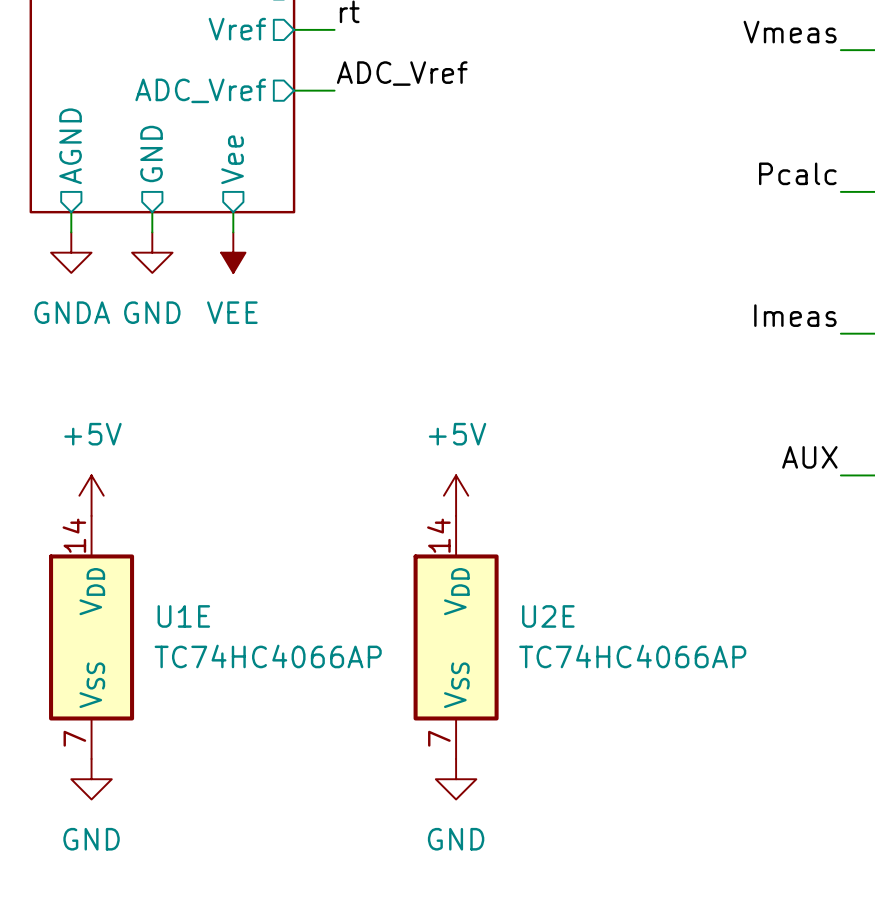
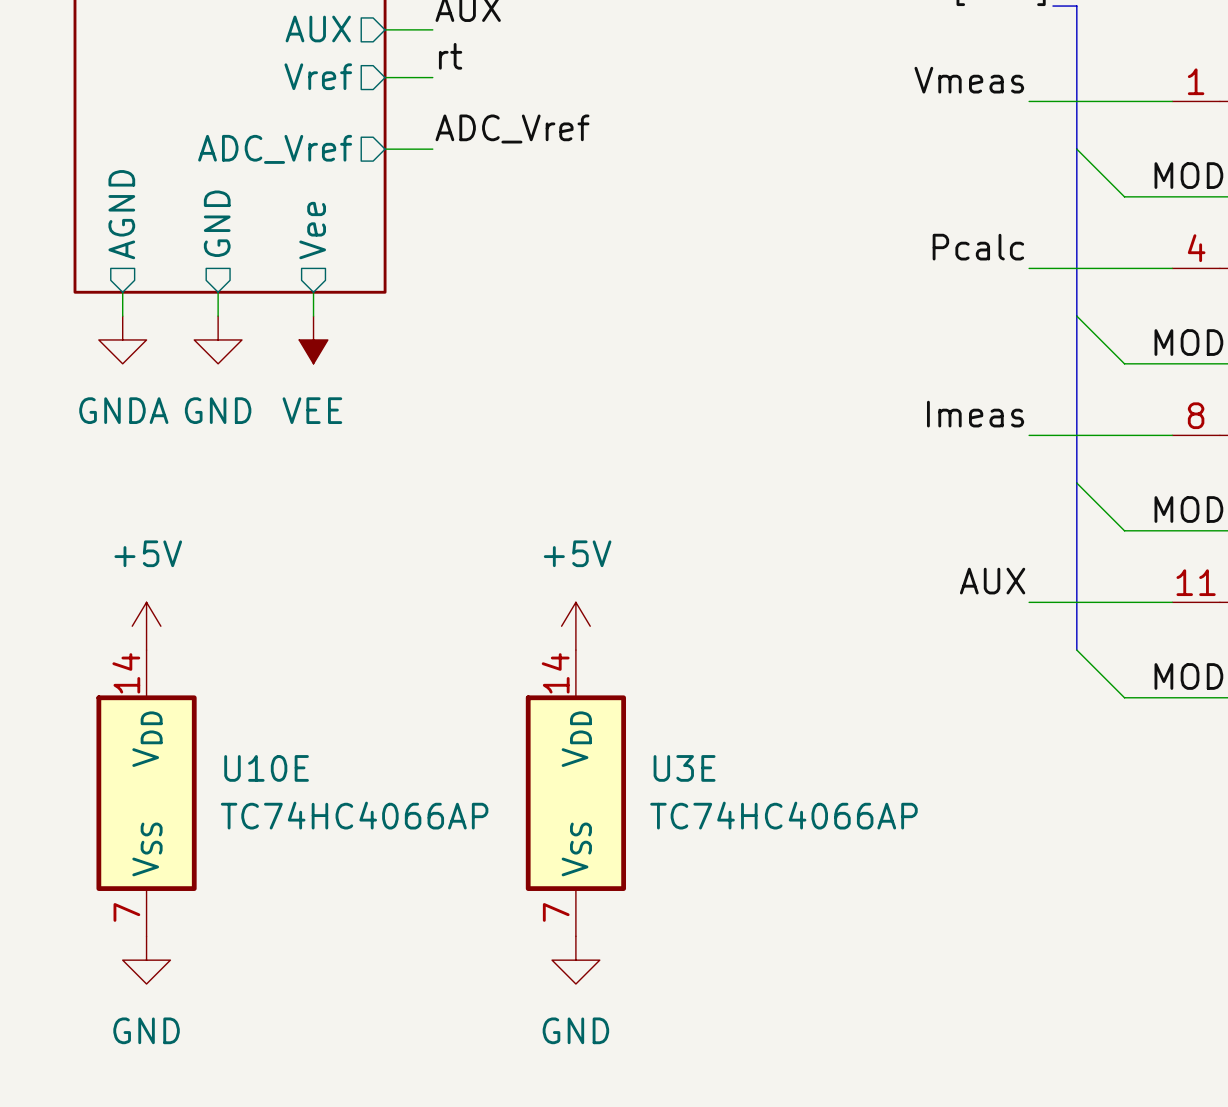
U1E name: U1E (183, 616) -> U10E (266, 768)
U2E name: U2E (548, 616) -> U3E (684, 768)

